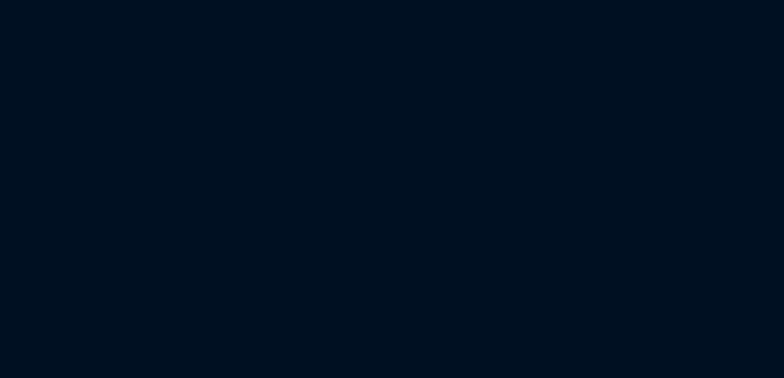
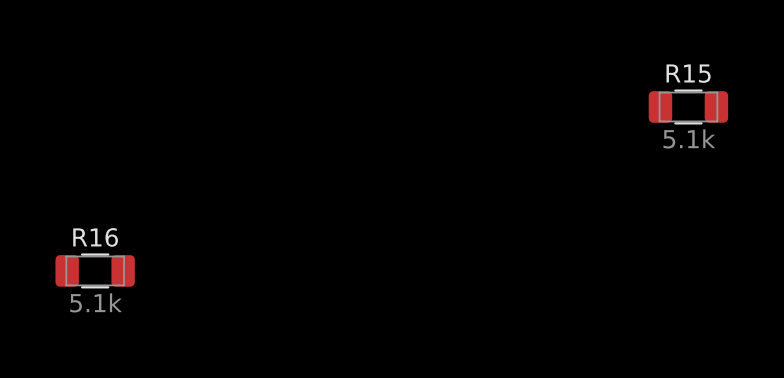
R15: none -> 5.1k (688, 106)
R16: none -> 5.1k (95, 270)

